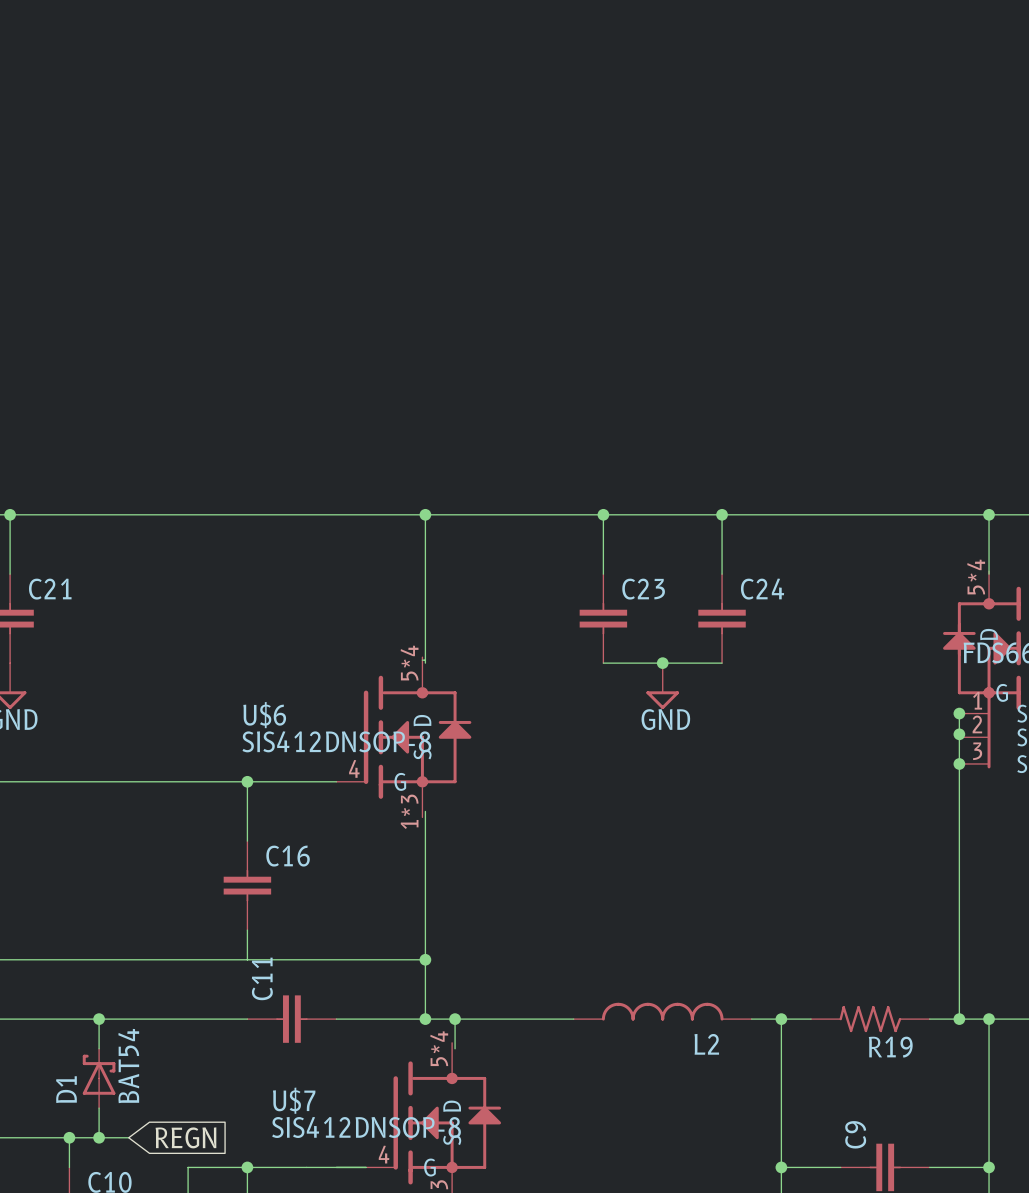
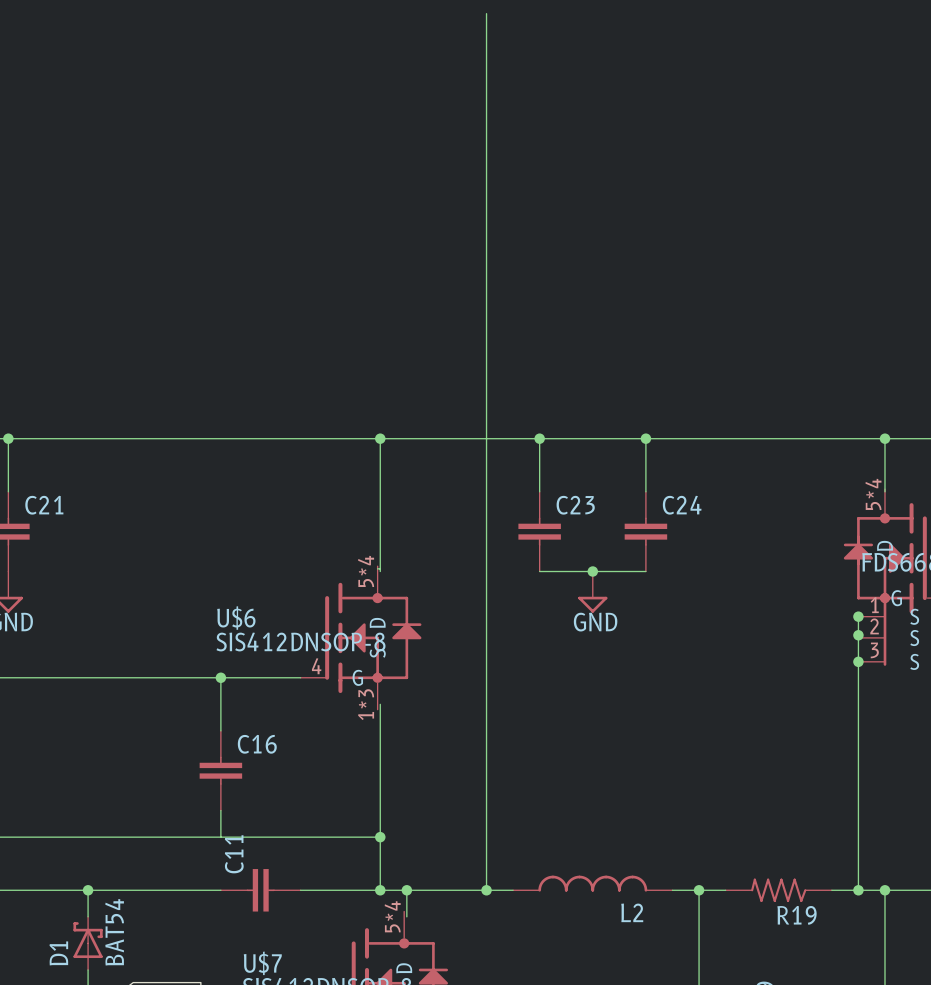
wire: none -> (486, 13) (486, 890)
junction: none -> (486, 890)

